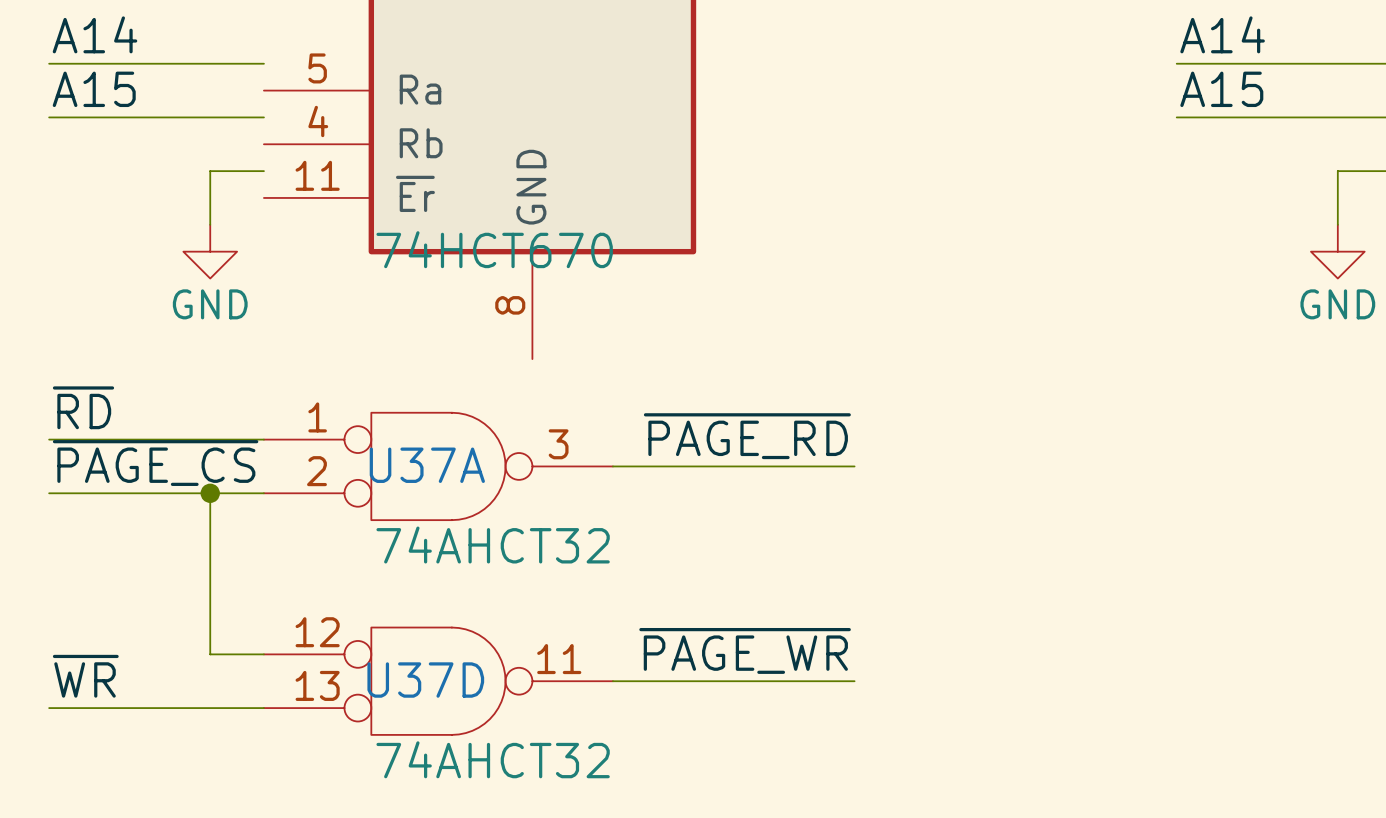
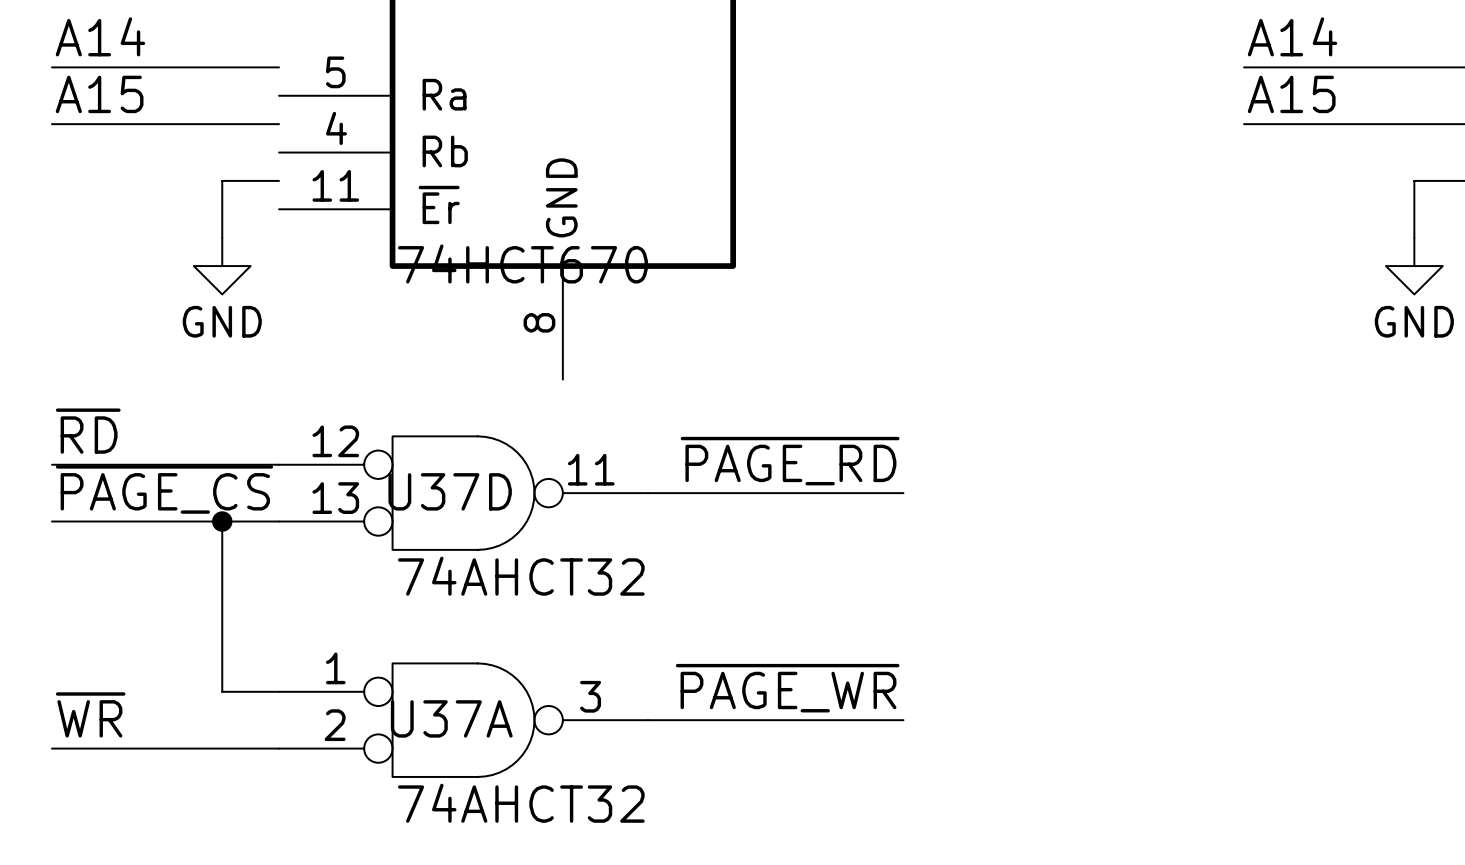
U37A position: (438, 466) -> (463, 720)
U37D position: (438, 681) -> (463, 493)

